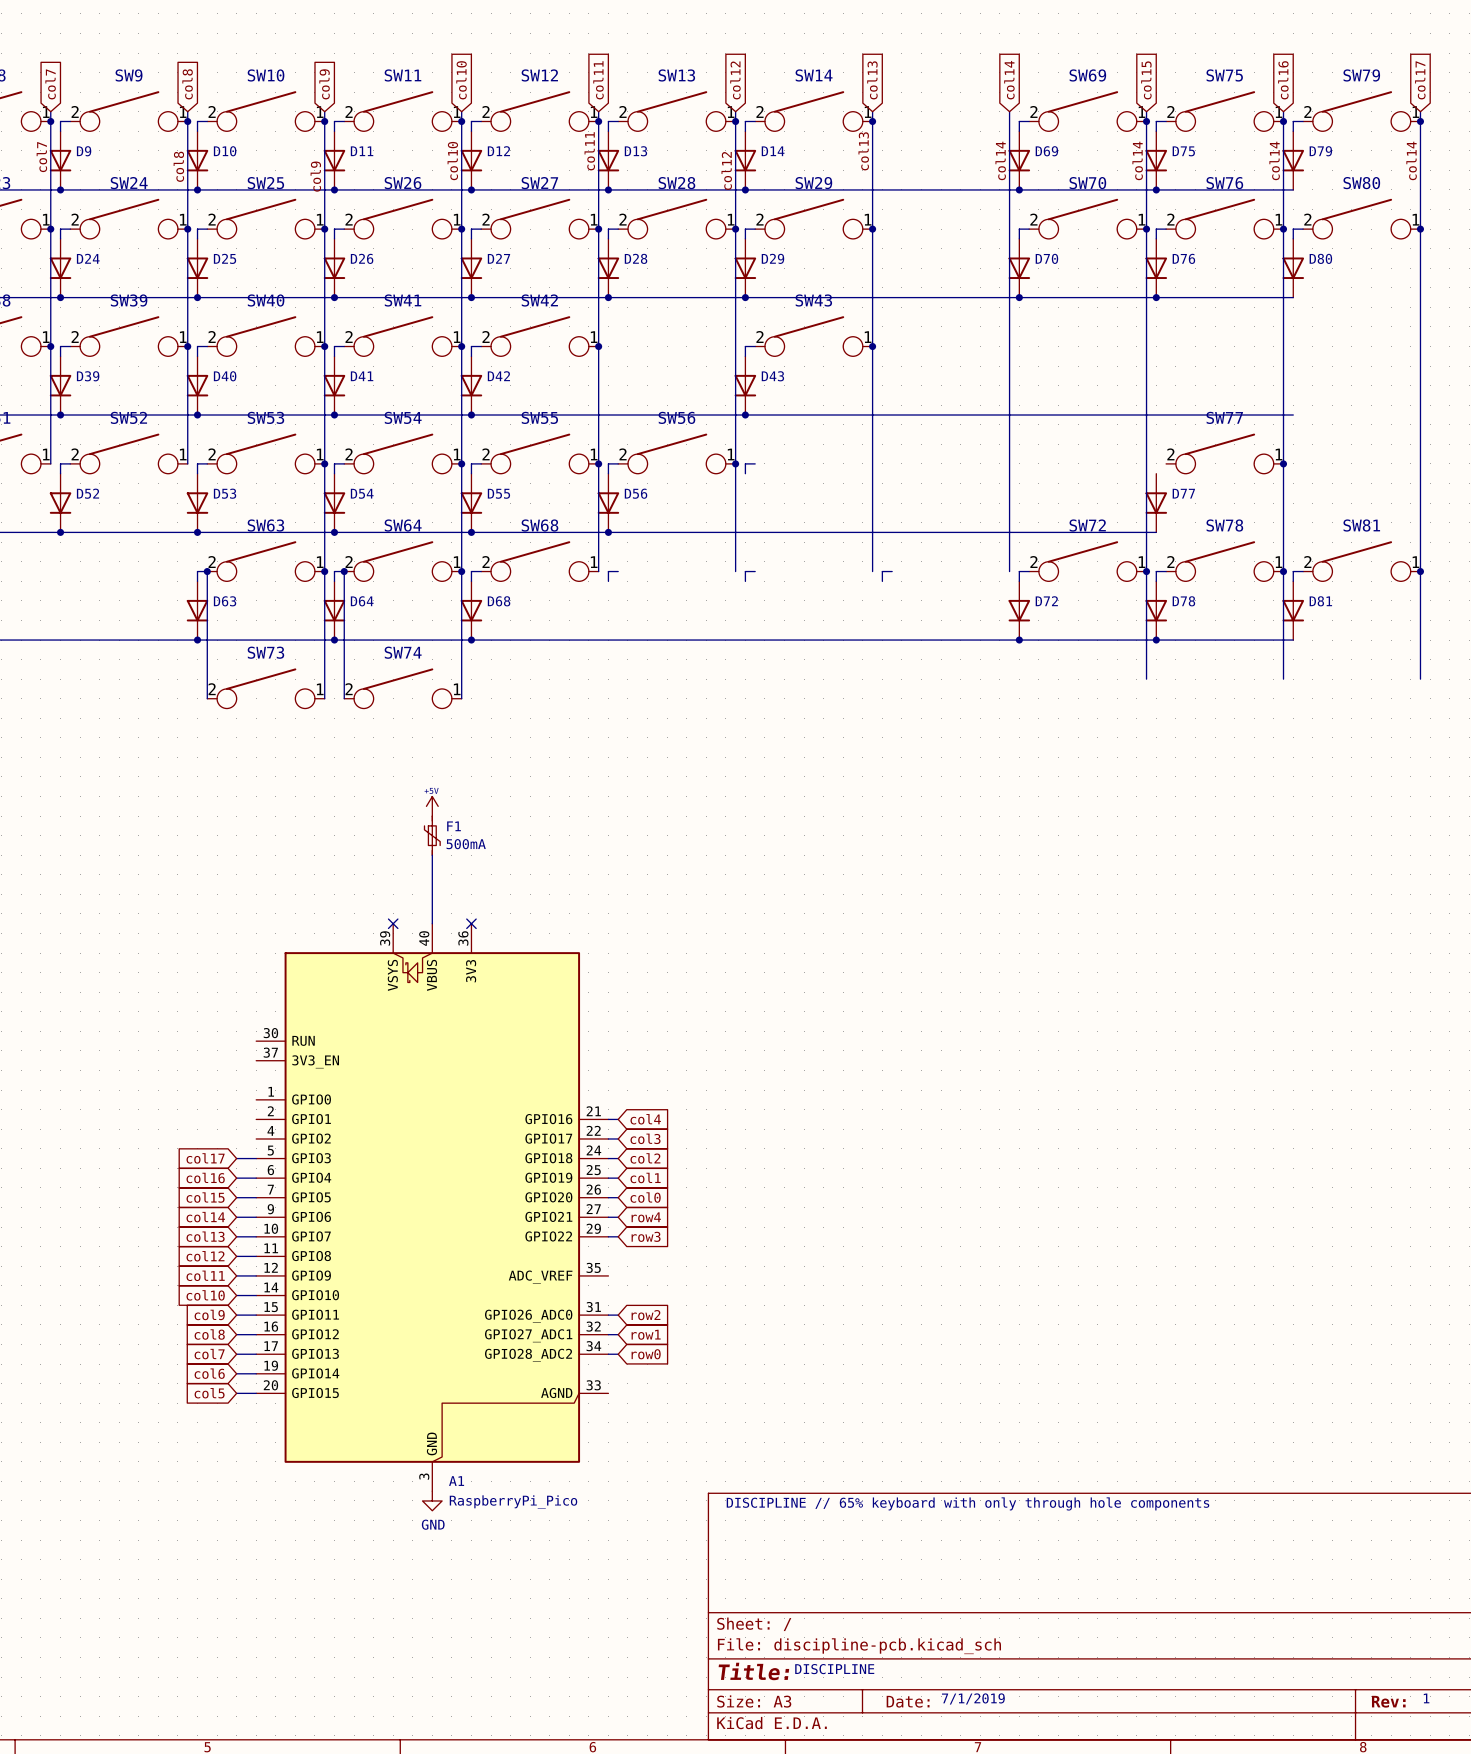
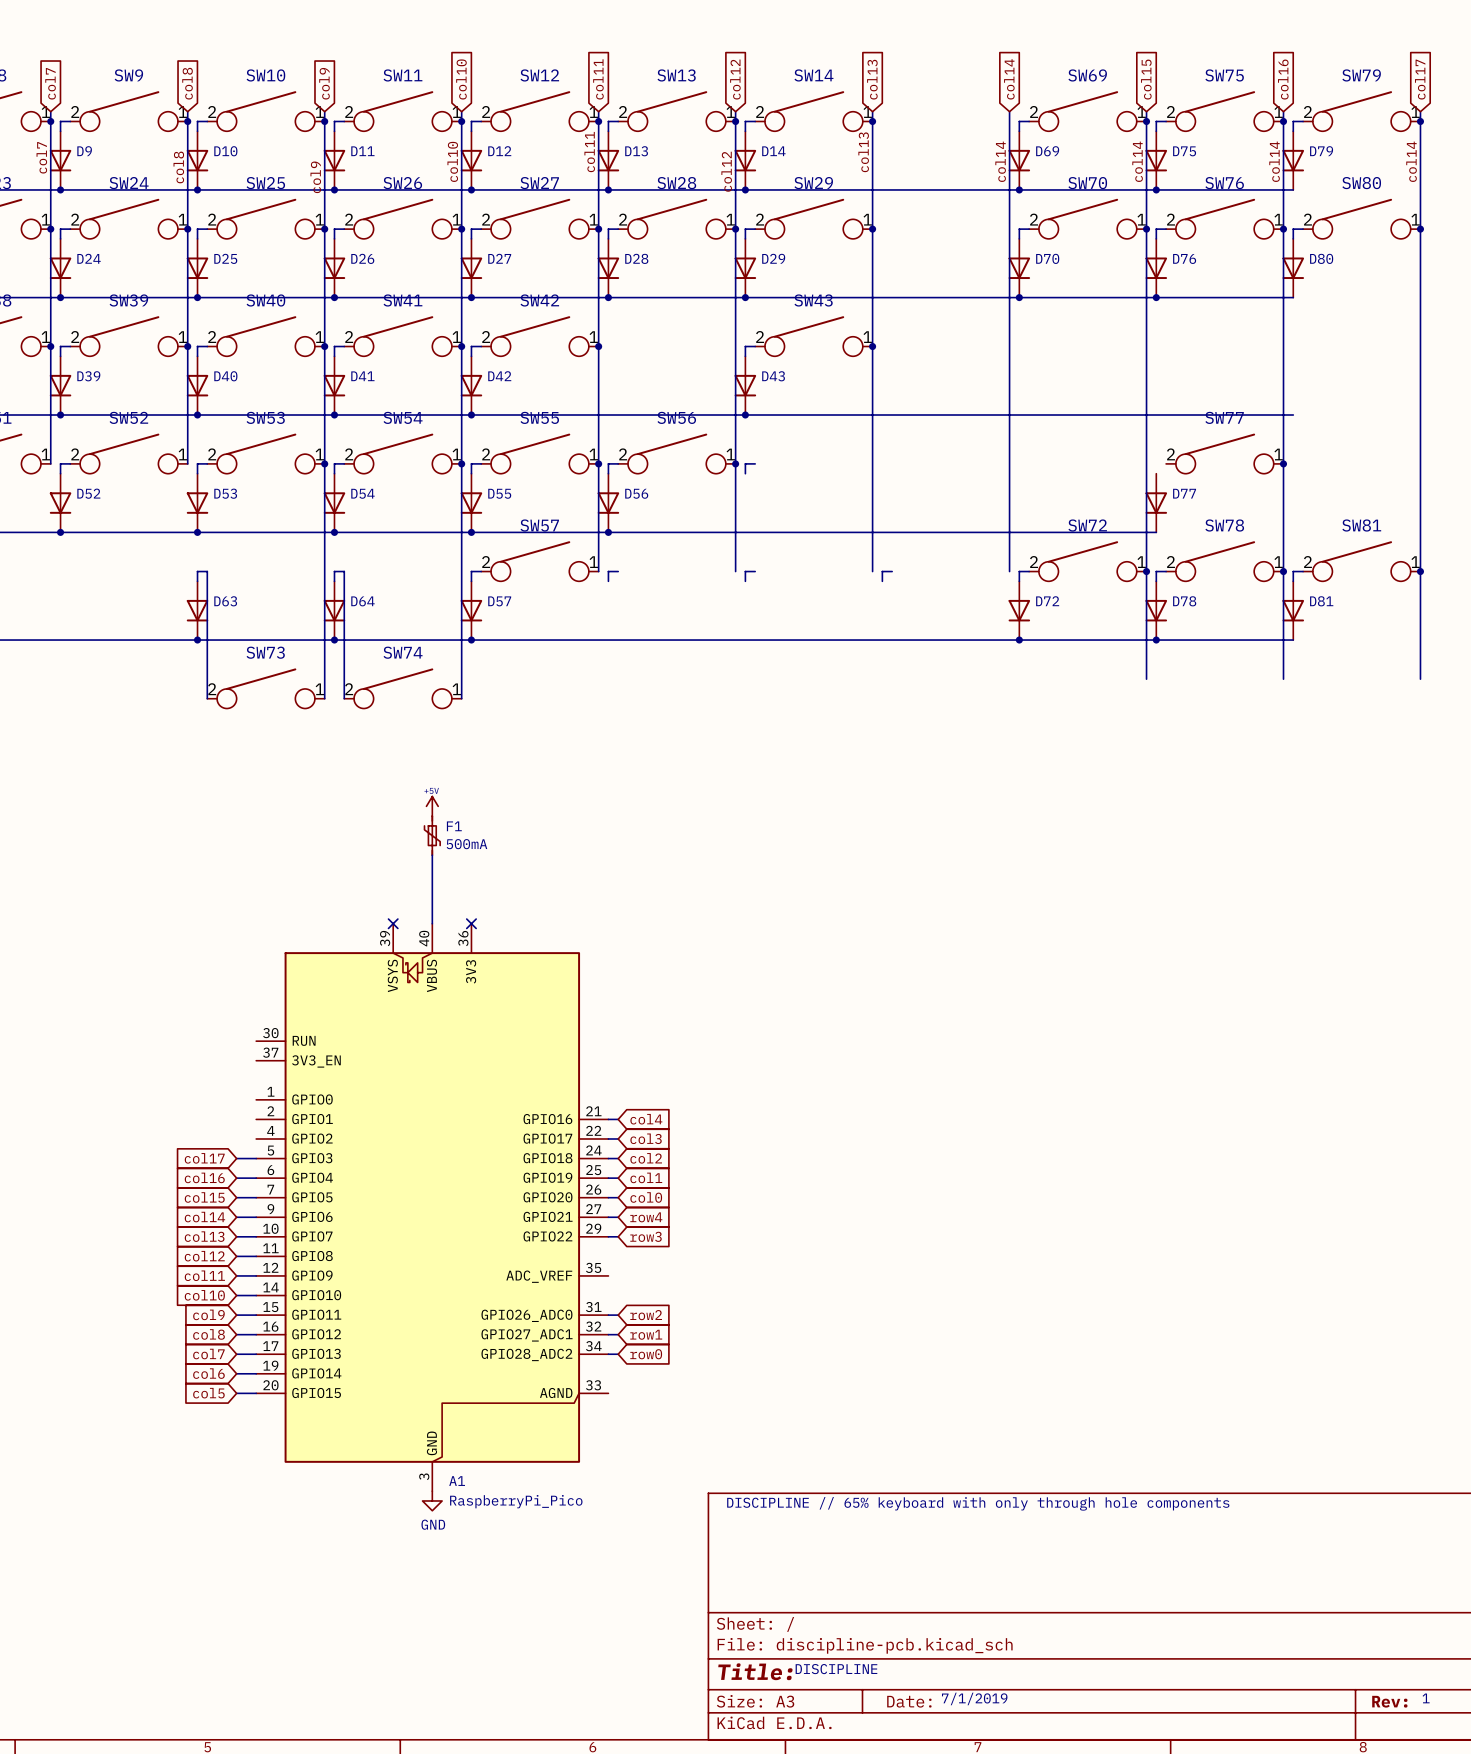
SW68 name: SW68 (539, 525) -> SW57 (539, 525)
SW63: (266, 561) -> none
SW64: (402, 561) -> none
junction: (207, 571) -> none
junction: (324, 571) -> none
junction: (344, 571) -> none
junction: (461, 571) -> none
D68 name: D68 (499, 601) -> D57 (499, 601)

